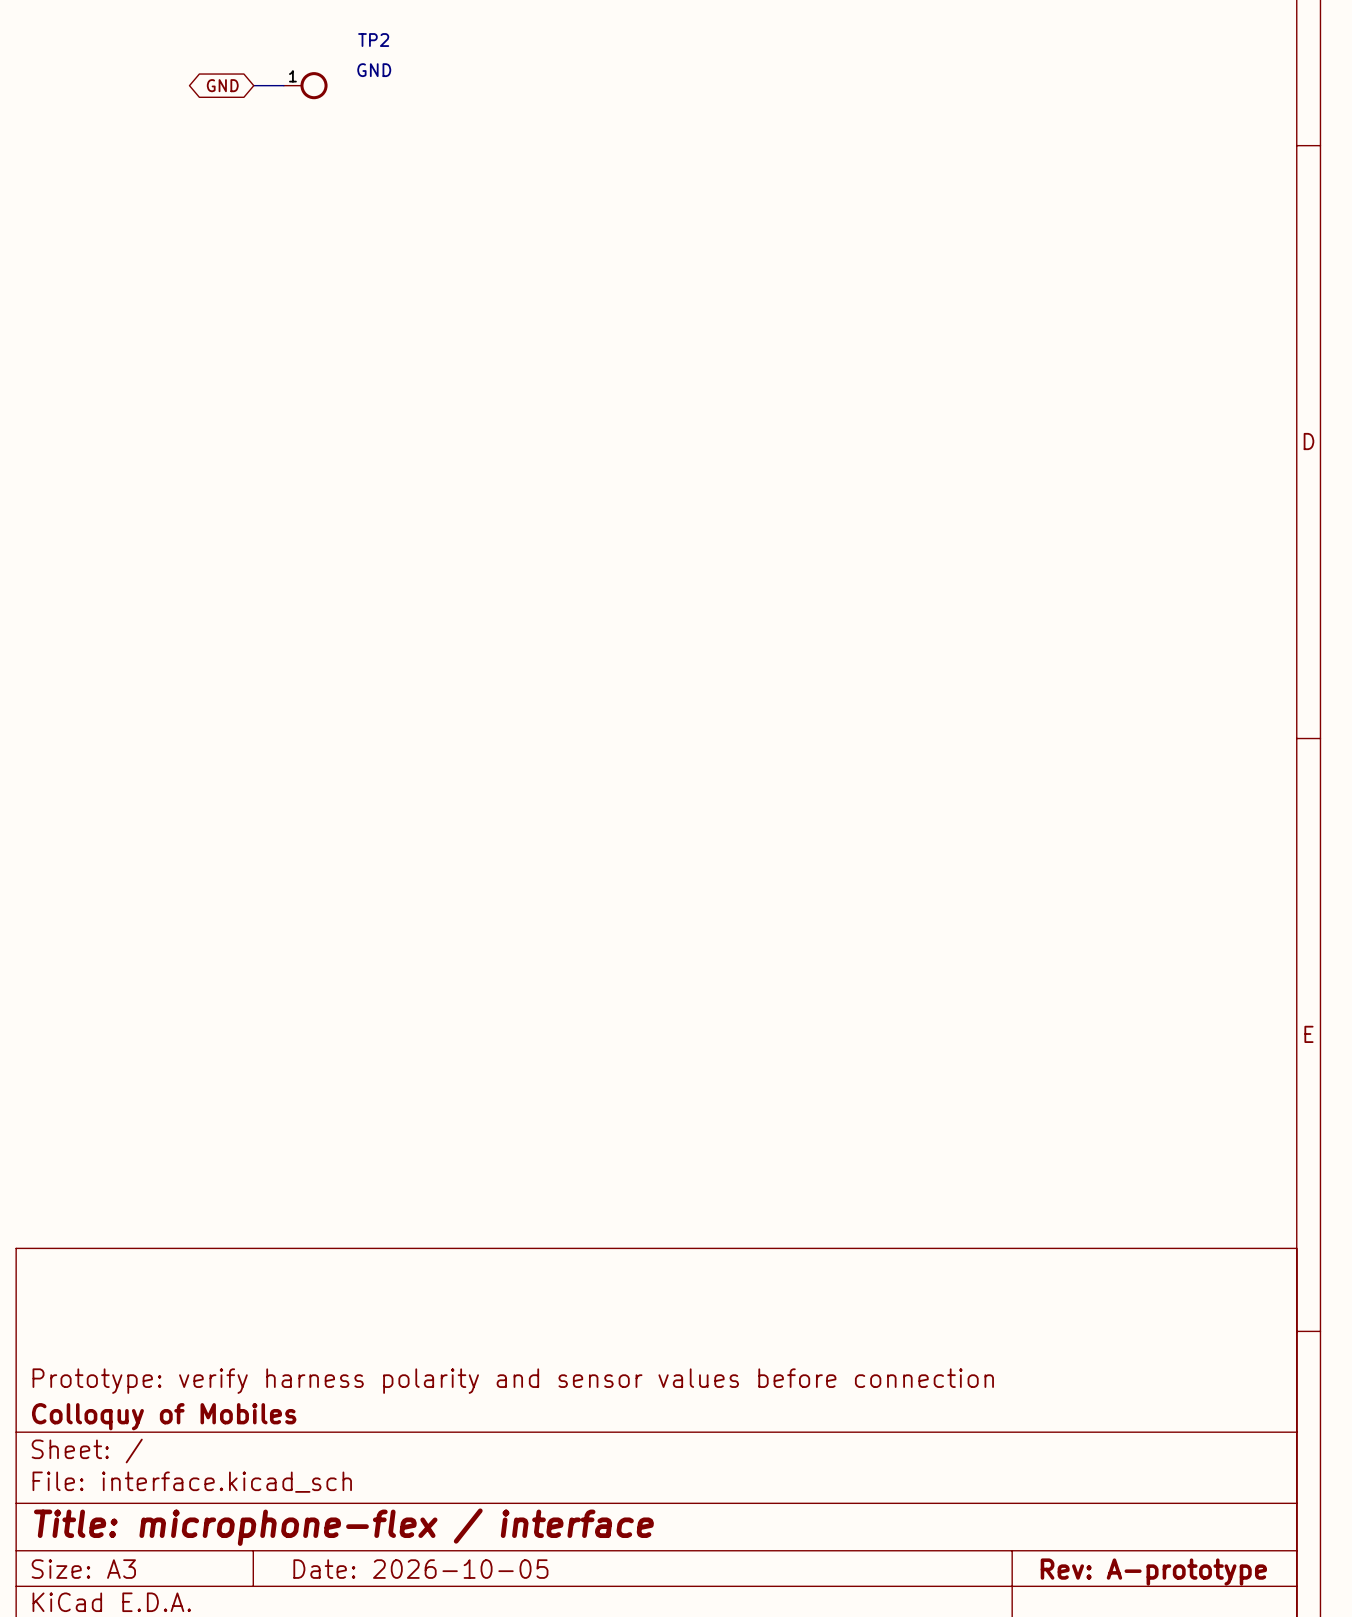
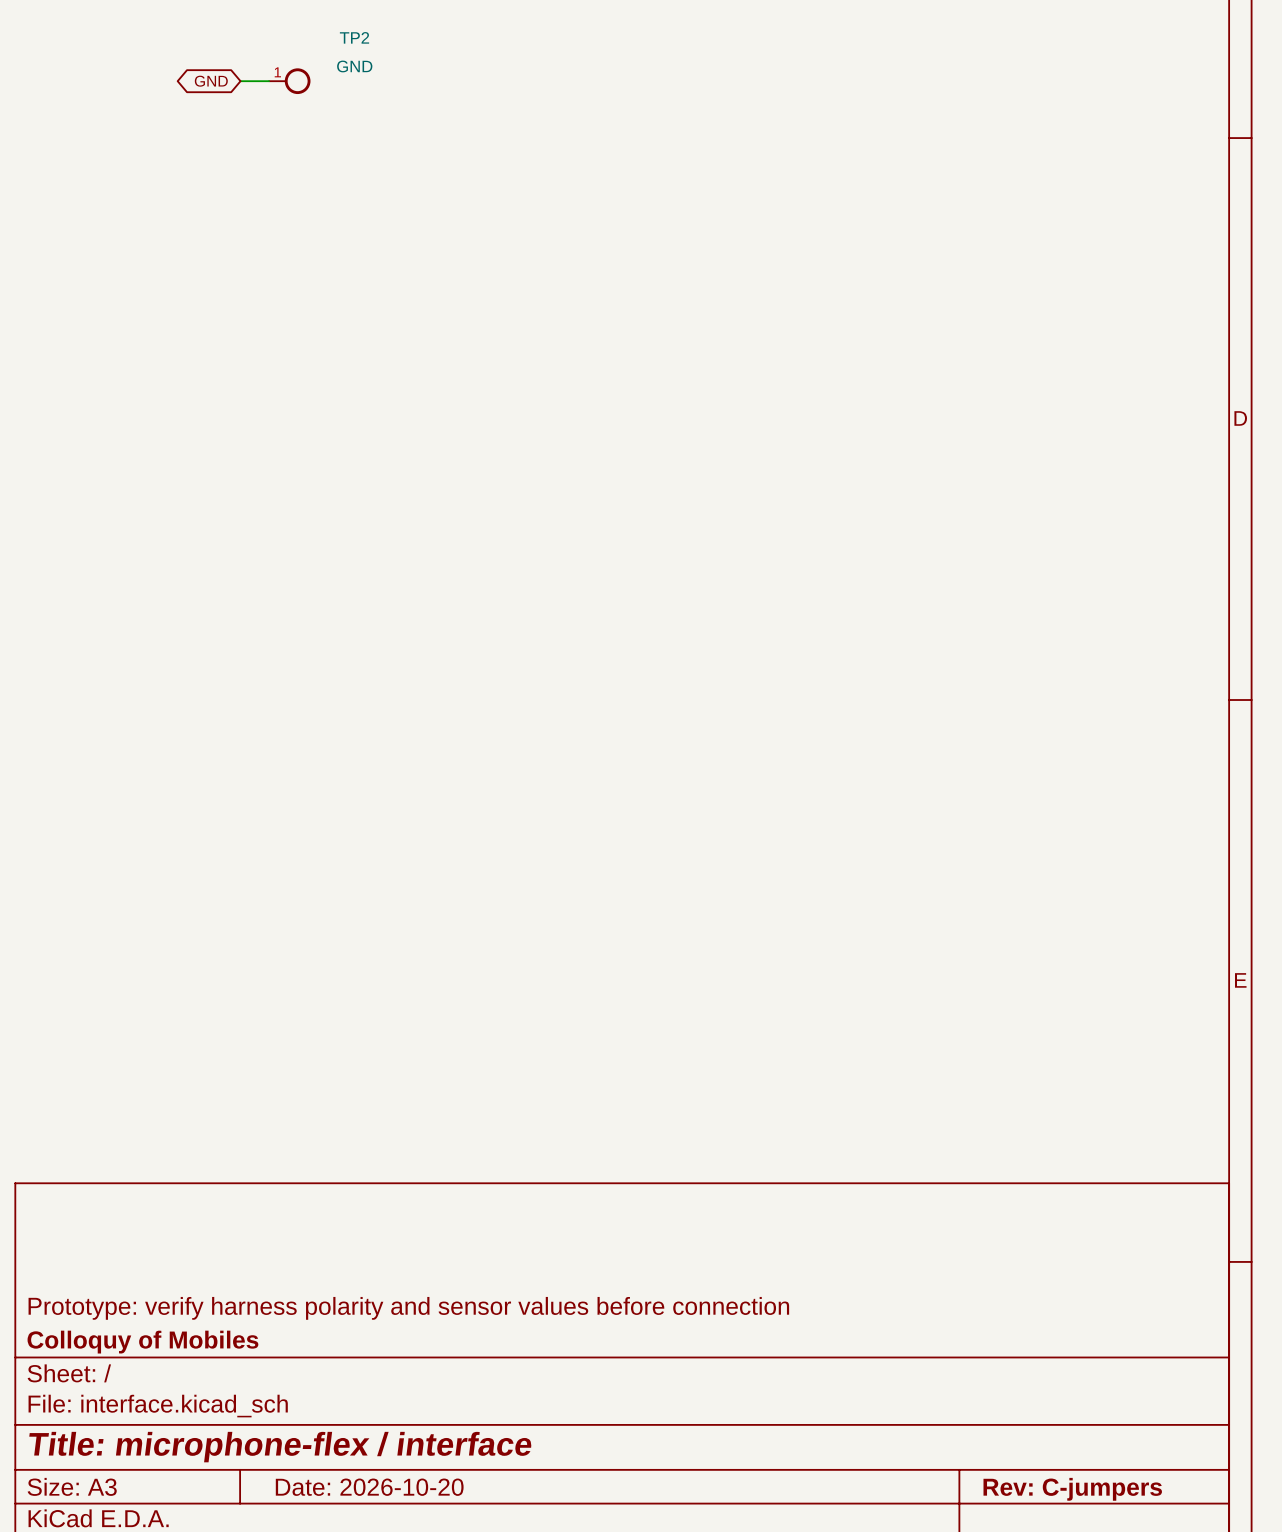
title block: Date: 2026-10-05 (420, 1569) -> Date: 2026-10-20 (369, 1487)
title block: Rev: A-prototype (1153, 1572) -> Rev: C-jumpers (1072, 1489)

